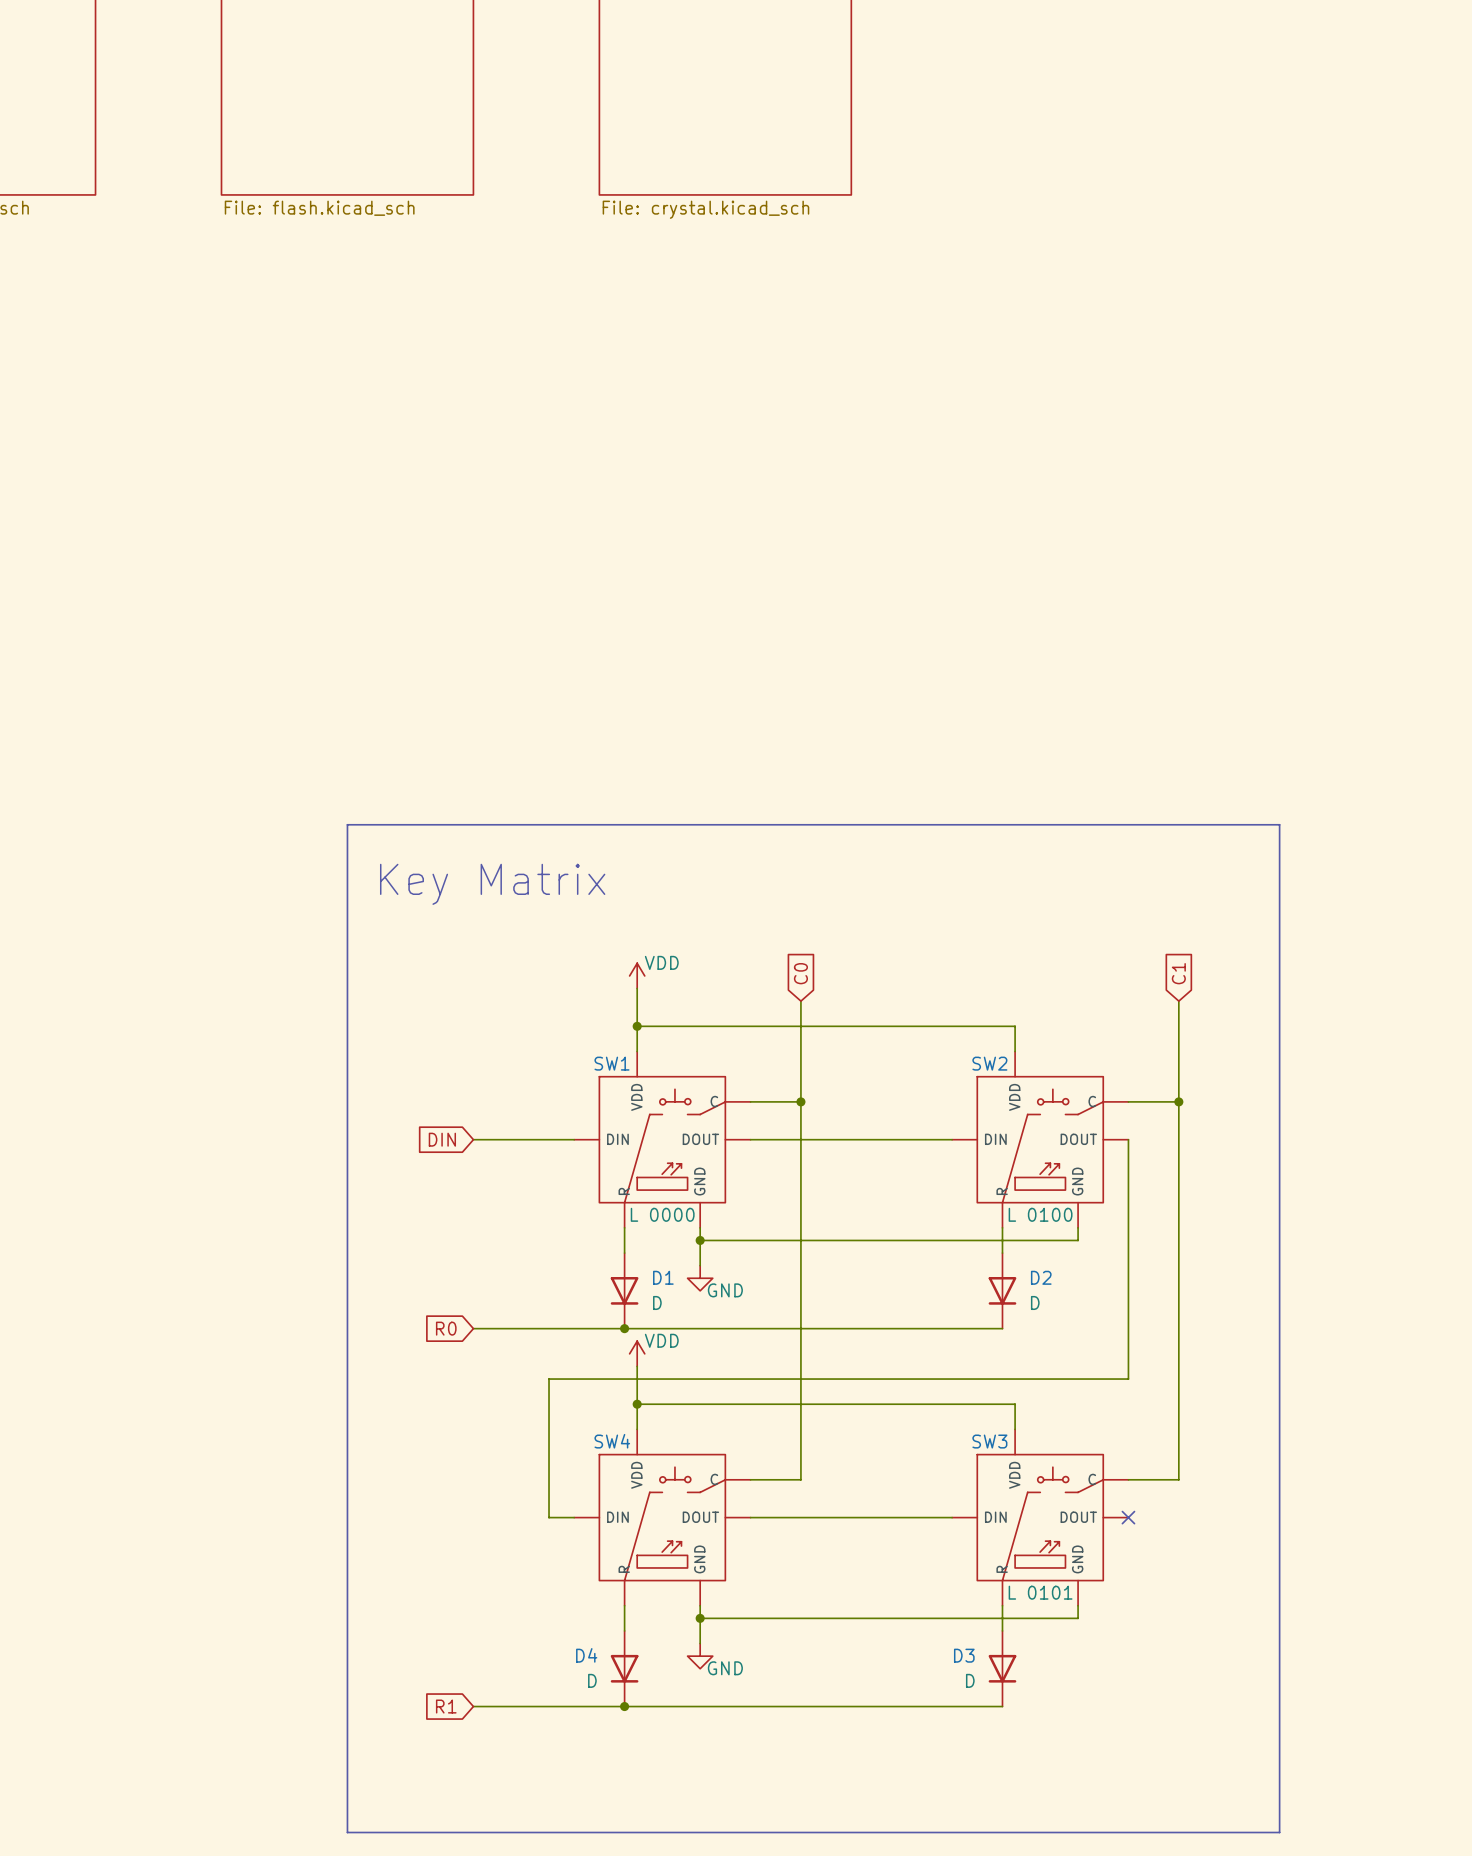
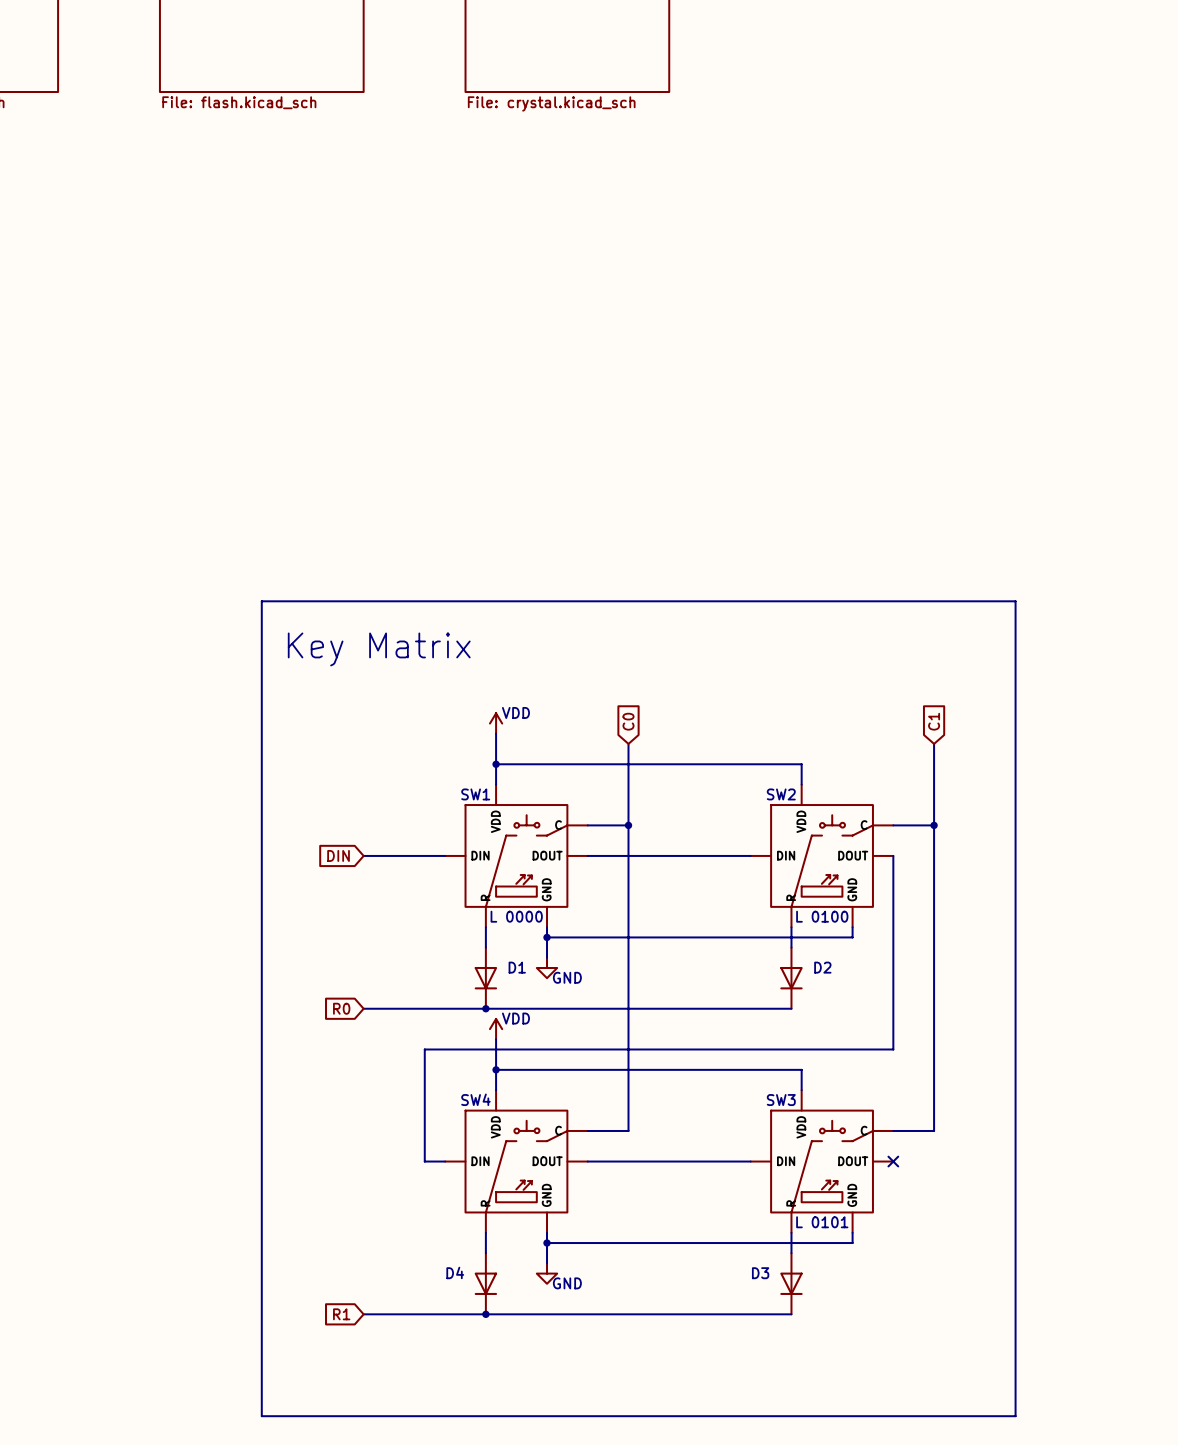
D1 value: D (657, 1302) -> none
D2 value: D (1035, 1302) -> none
D4 value: D (592, 1680) -> none
D3 value: D (970, 1680) -> none

